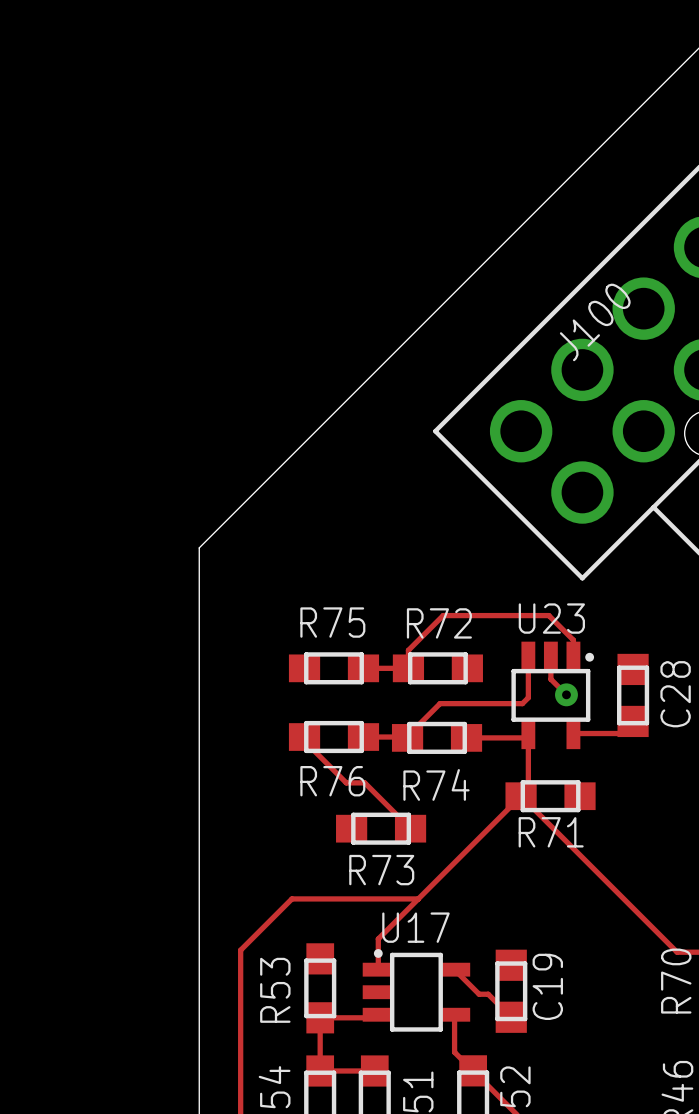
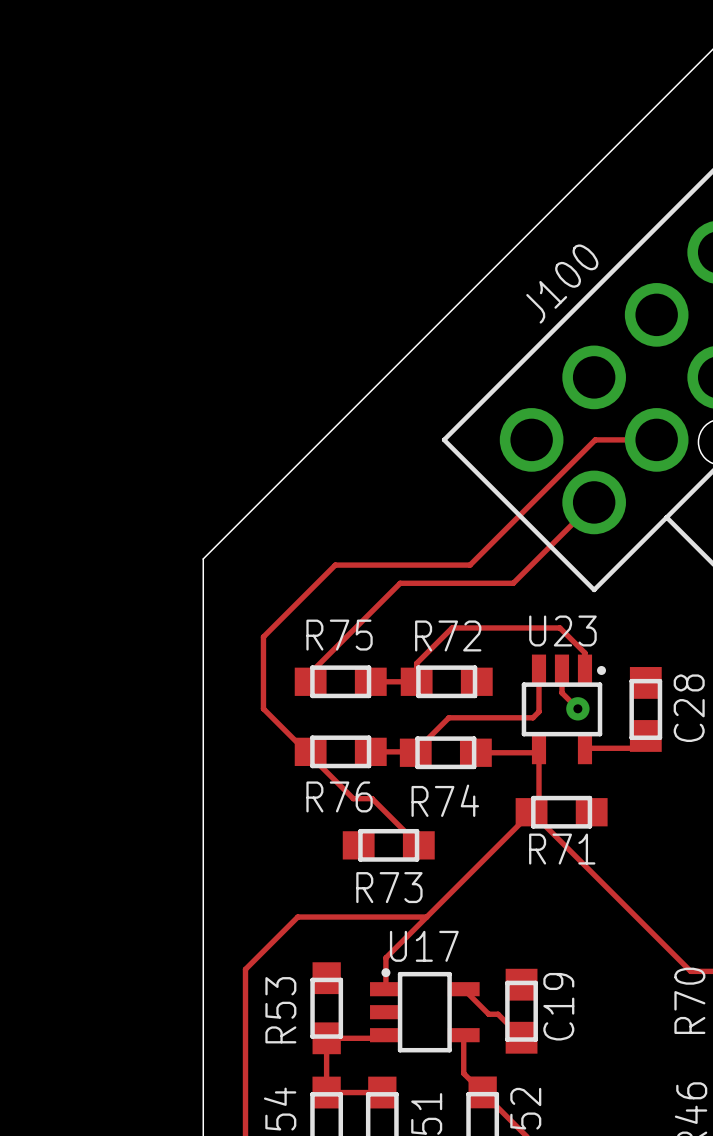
J100 name position: J100 (595, 322) -> J100 (562, 284)
track: none -> (656, 439) (595, 439) (470, 565) (335, 565) (263, 636) (263, 708) (310, 756)
track: none -> (594, 502) (513, 583) (400, 583) (310, 672) (310, 681)

